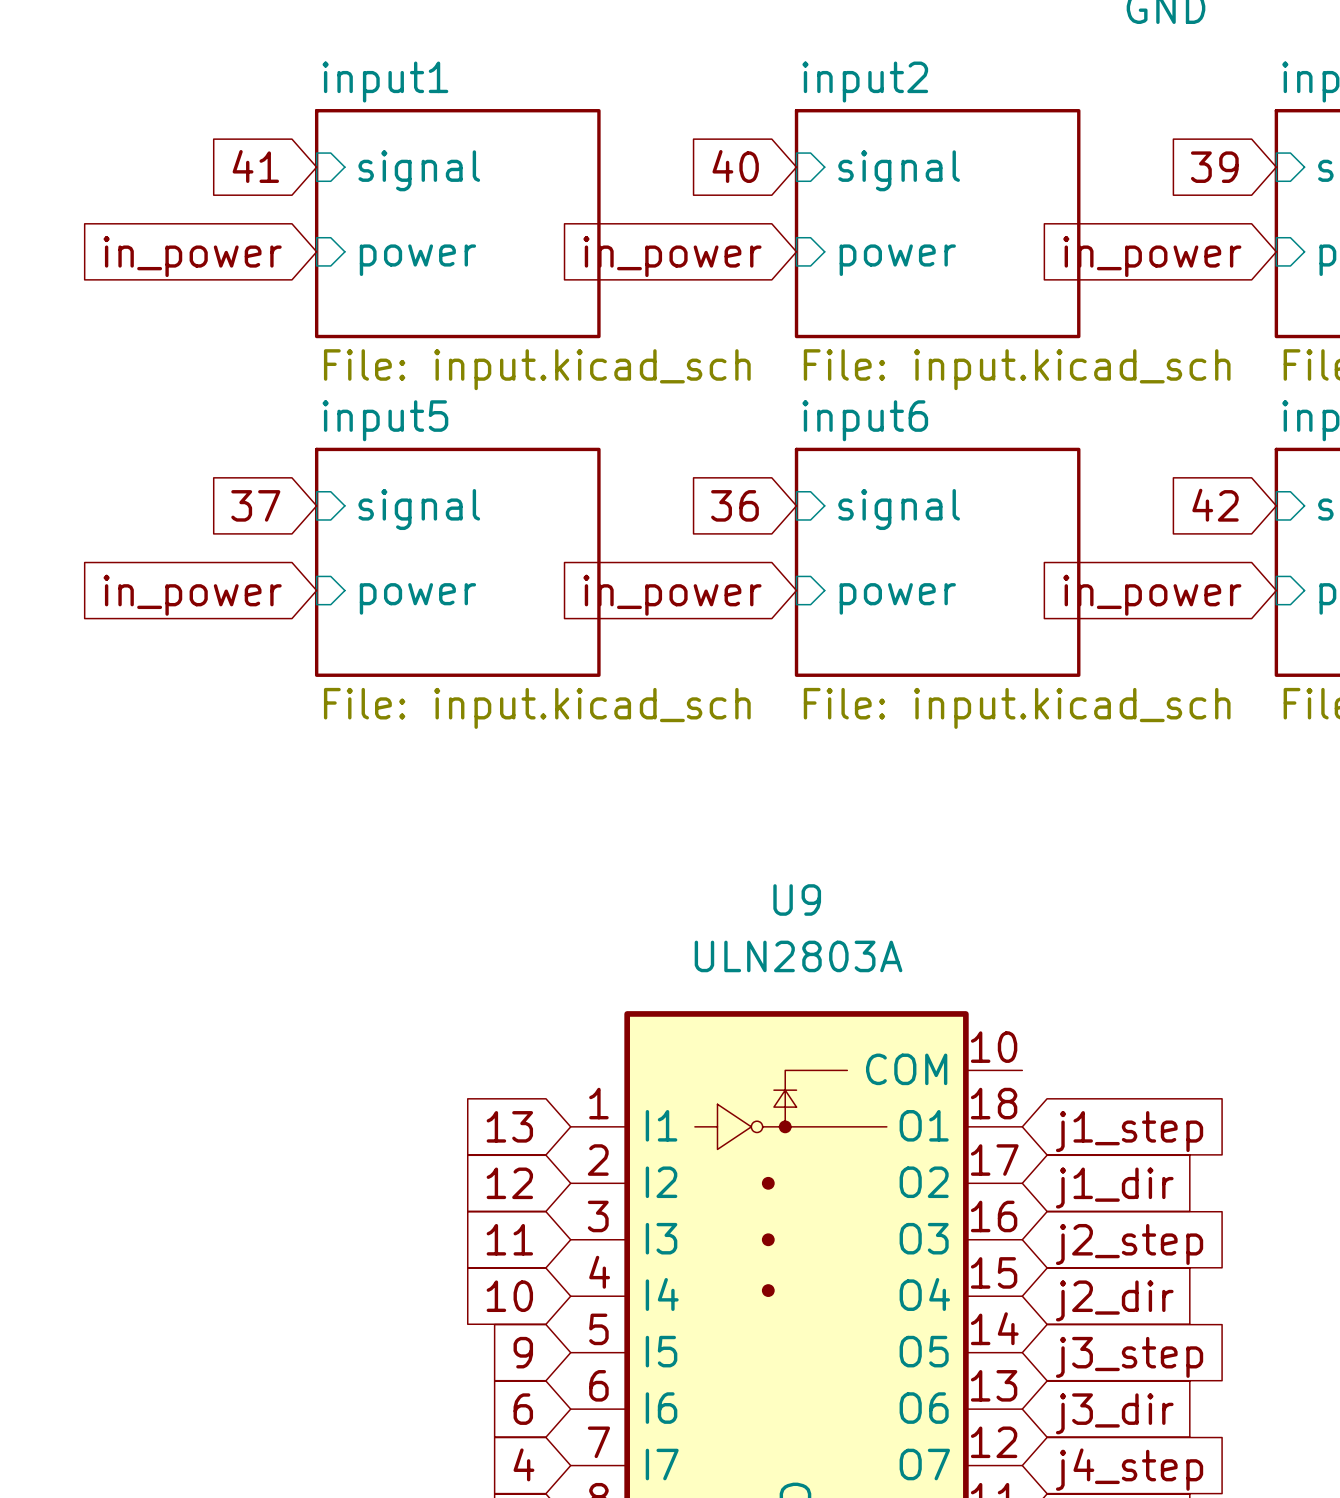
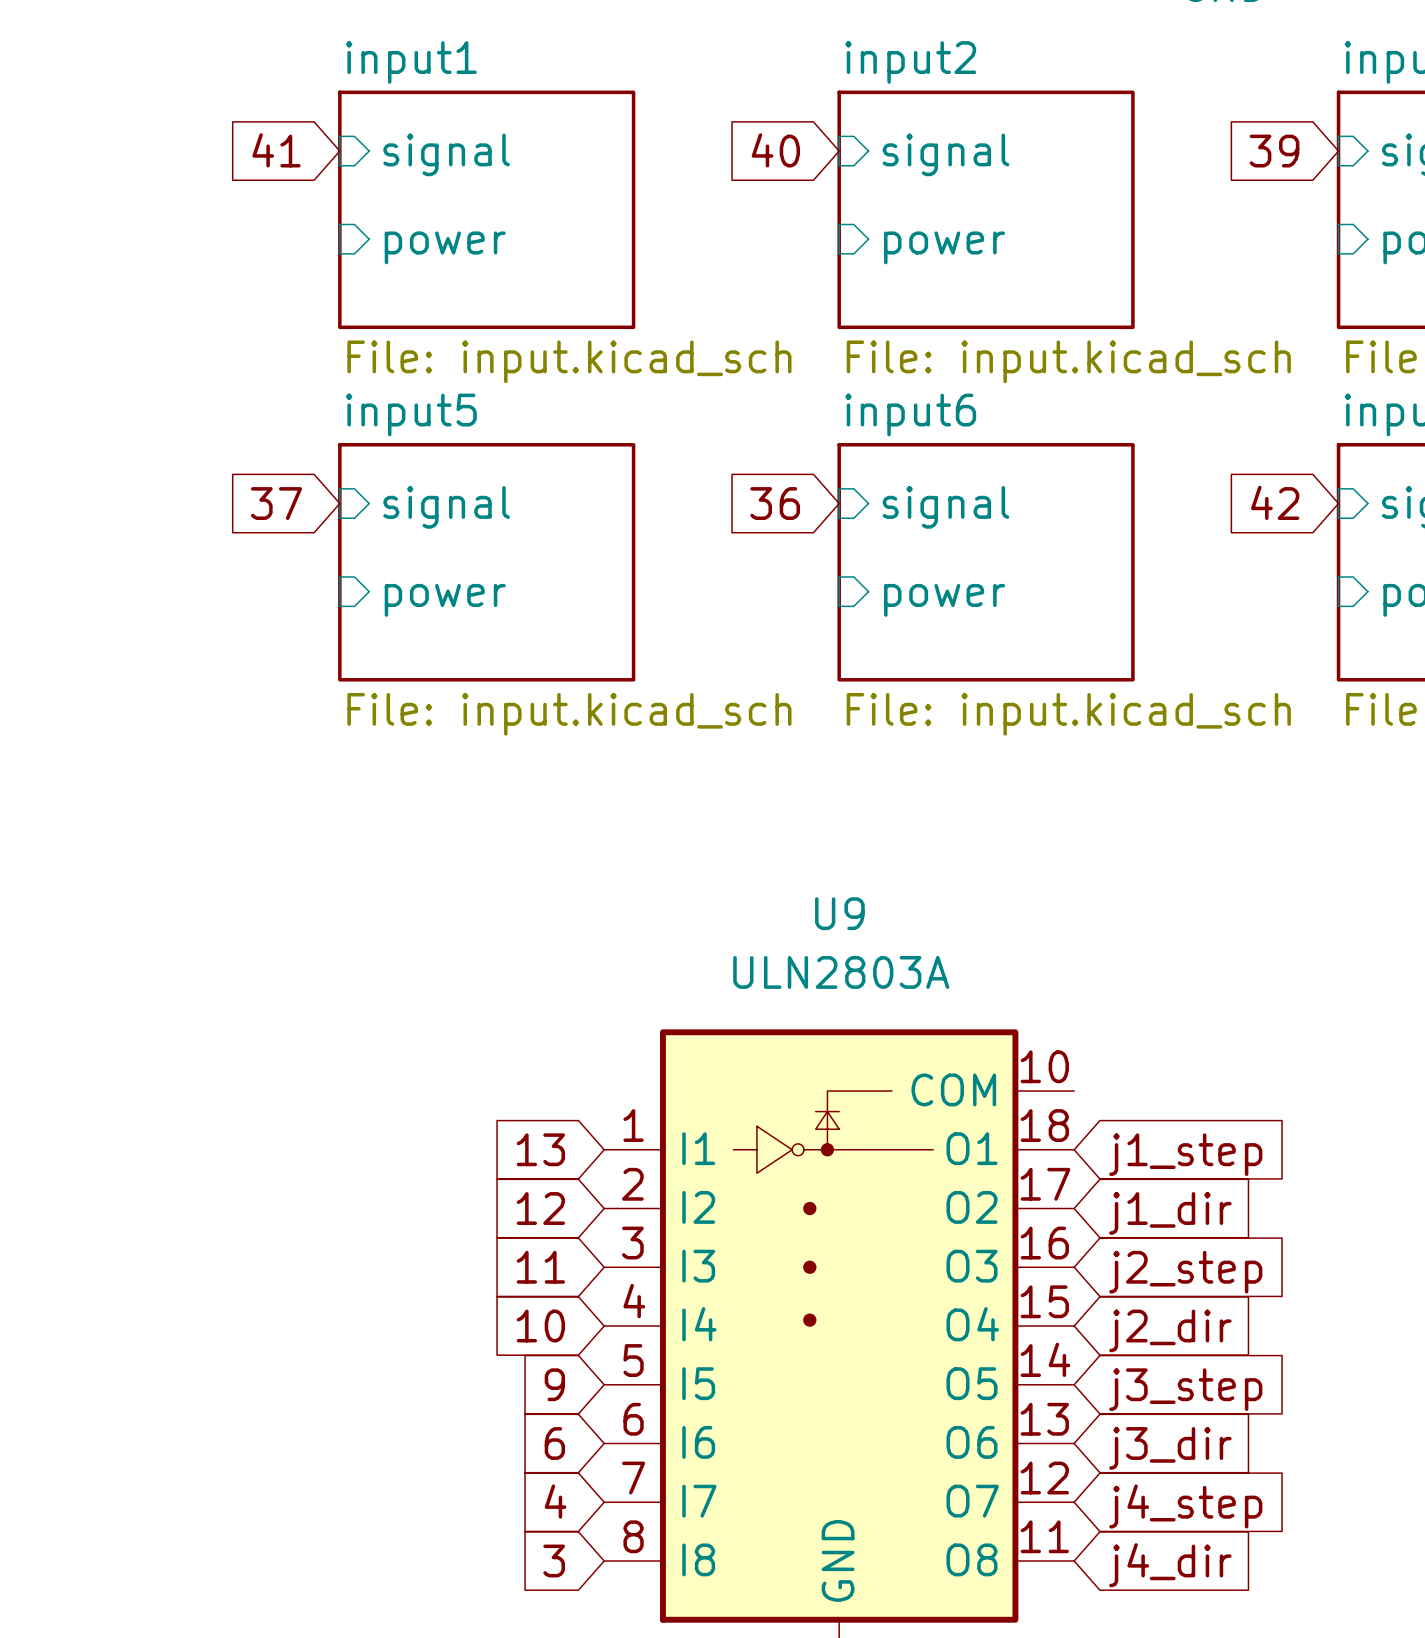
global label: in_power (192, 256) -> none
global label: in_power (672, 256) -> none
global label: in_power (1152, 256) -> none
global label: in_power (192, 595) -> none
global label: in_power (672, 595) -> none
global label: in_power (1152, 595) -> none

